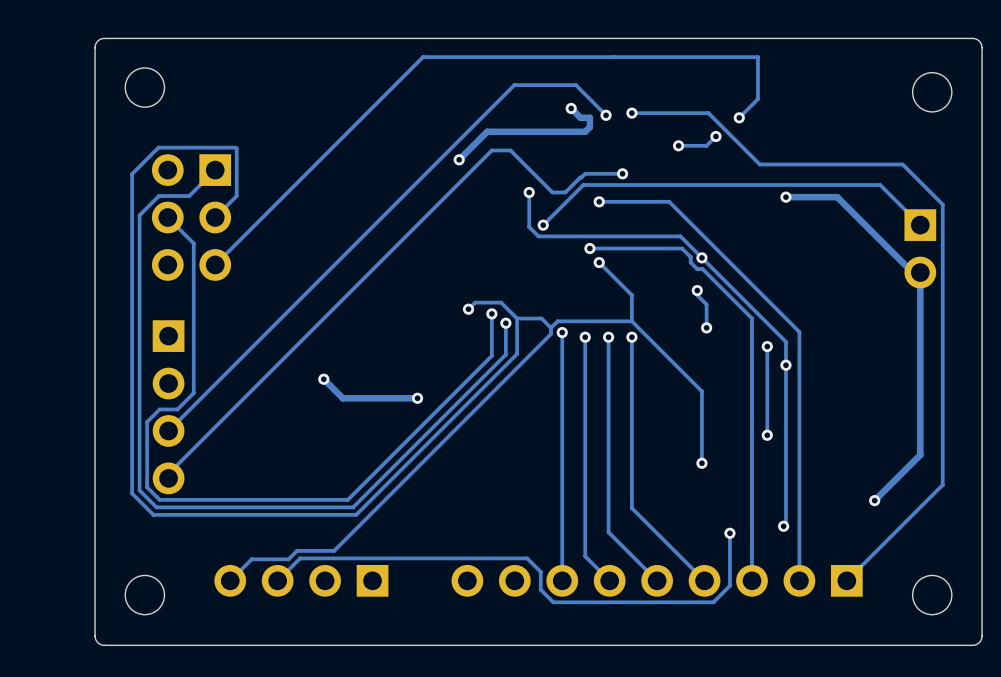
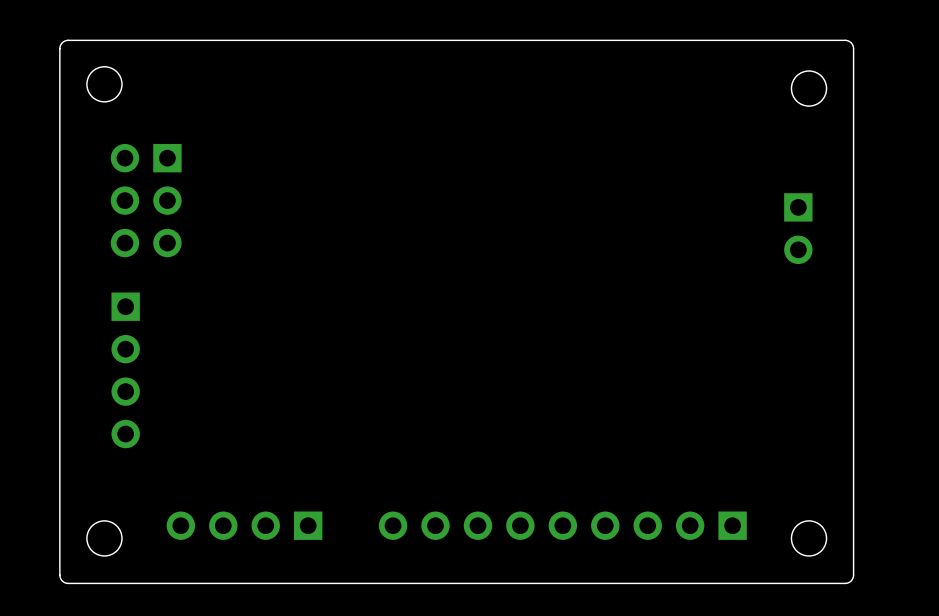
track: (571, 108) (580, 117) (589, 117) (589, 127) (585, 131) (487, 131) (459, 159) -> none
via: (571, 108) -> none
track: (631, 113) (708, 113) (759, 164) (902, 164) (942, 204) (942, 484) (846, 580) -> none
via: (631, 113) -> none
track: (606, 115) (575, 85) (514, 85) (168, 430) -> none
via: (606, 115) -> none
track: (739, 117) (757, 99) (757, 57) (423, 57) (215, 264) -> none
via: (739, 117) -> none
track: (715, 136) (706, 145) (678, 145) -> none
via: (715, 136) -> none
via: (678, 145) -> none
via: (459, 159) -> none
track: (215, 170) (189, 196) (158, 196) (139, 215) (139, 490) (156, 507) (353, 507) (505, 354) (505, 323) -> none
track: (622, 173) (585, 173) (565, 192) (552, 192) (510, 150) (491, 150) (168, 473) (168, 478) -> none
via: (622, 173) -> none
track: (529, 192) (529, 227) (538, 236) (680, 236) (785, 341) (785, 523) (783, 526) (781, 523) -> none
via: (529, 192) -> none
track: (785, 197) (837, 197) (912, 272) (920, 272) (920, 454) (874, 500) -> none
via: (785, 197) -> none
track: (599, 201) (669, 201) (799, 331) (799, 580) -> none
via: (599, 201) -> none
track: (167, 217) (193, 243) (193, 393) (177, 409) (159, 409) (147, 422) (147, 487) (159, 499) (347, 499) (491, 355) (491, 313) -> none
track: (215, 217) (236, 196) (235, 147) (158, 147) (132, 174) (132, 493) (153, 514) (356, 514) (517, 354) (517, 318) -> none
via: (543, 225) -> none
track: (920, 225) (880, 185) (583, 185) (543, 225) -> none
track: (589, 248) (682, 248) (690, 257) (690, 262) (697, 269) (702, 269) (751, 318) (751, 580) -> none
via: (589, 248) -> none
via: (701, 257) -> none
track: (599, 262) (631, 295) (631, 321) -> none
via: (599, 262) -> none
track: (697, 290) (697, 295) (706, 304) (706, 327) -> none
via: (697, 290) -> none
track: (468, 309) (475, 302) (501, 302) (517, 318) -> none
via: (468, 309) -> none
via: (491, 313) -> none
track: (517, 318) (541, 318) (551, 327) -> none
track: (631, 321) (557, 321) (551, 327) -> none
track: (631, 321) (701, 391) (701, 463) -> none
via: (505, 323) -> none
track: (551, 327) (551, 334) (334, 550) (296, 550) (288, 559) (251, 559) (230, 580) -> none
via: (706, 327) -> none
track: (562, 332) (562, 580) -> none
via: (562, 332) -> none
track: (585, 337) (585, 556) (609, 580) -> none
via: (585, 337) -> none
track: (608, 337) (608, 532) (657, 580) -> none
via: (608, 337) -> none
track: (631, 337) (631, 508) (704, 580) -> none
via: (631, 337) -> none
track: (767, 346) (767, 435) -> none
via: (767, 346) -> none
via: (785, 365) -> none
track: (323, 379) (342, 398) (417, 398) -> none
via: (323, 379) -> none
via: (417, 398) -> none
via: (767, 435) -> none
via: (701, 463) -> none
via: (874, 500) -> none
via: (783, 526) -> none
track: (729, 533) (729, 585) (713, 602) (553, 602) (540, 589) (540, 571) (527, 558) (300, 558) (277, 580) -> none
via: (729, 533) -> none

